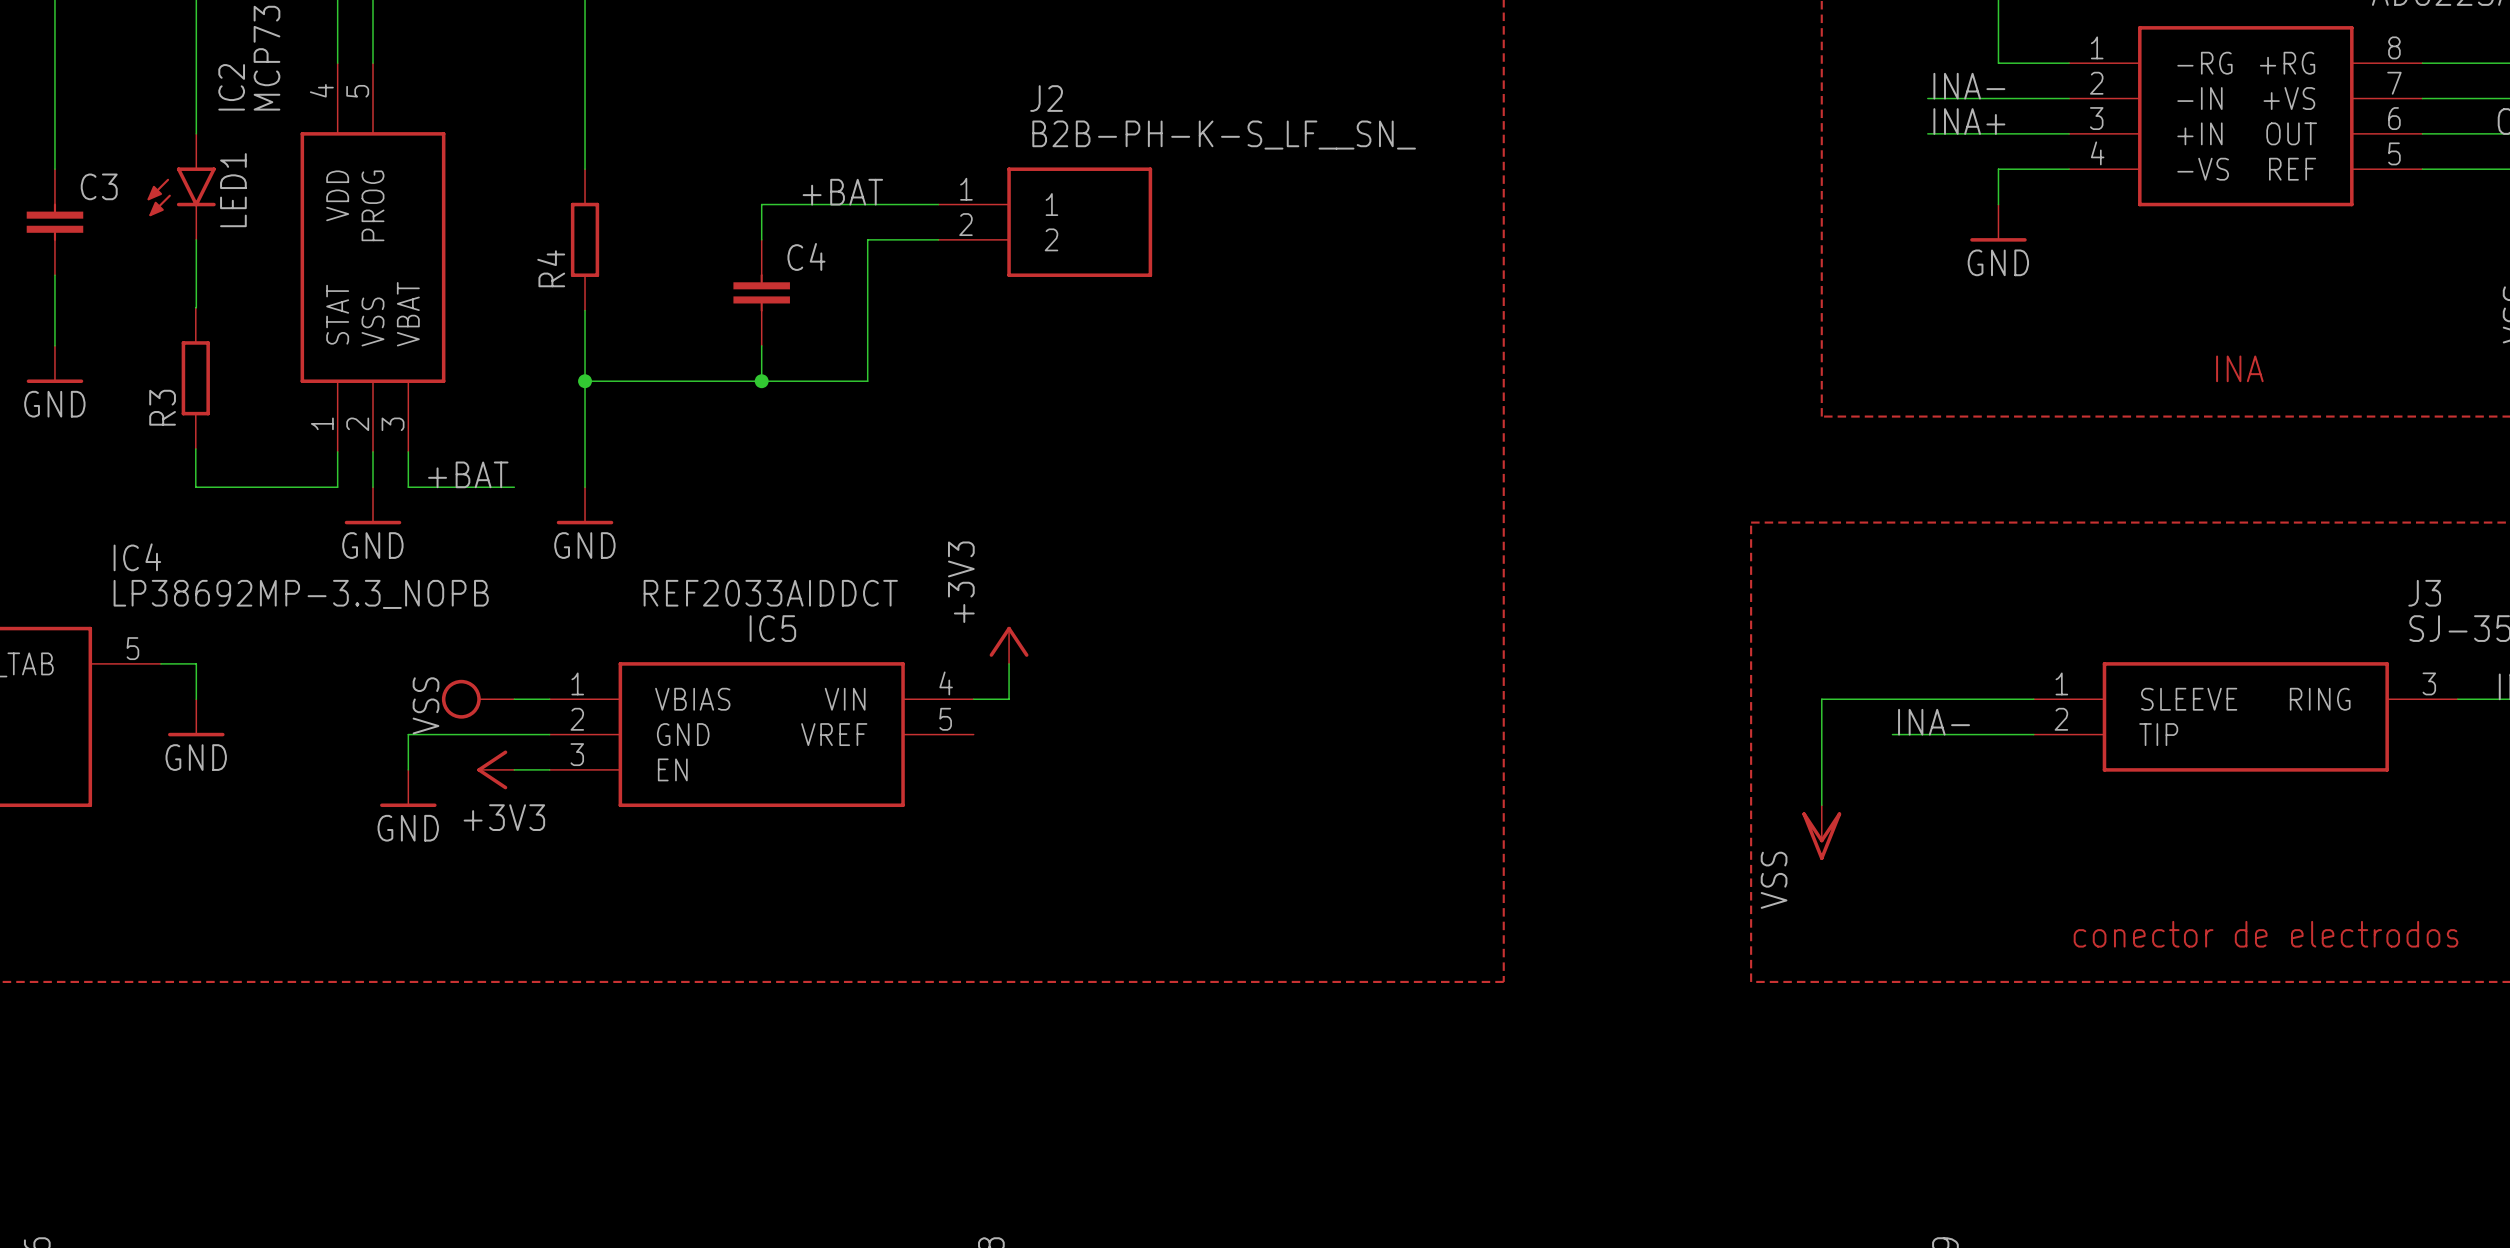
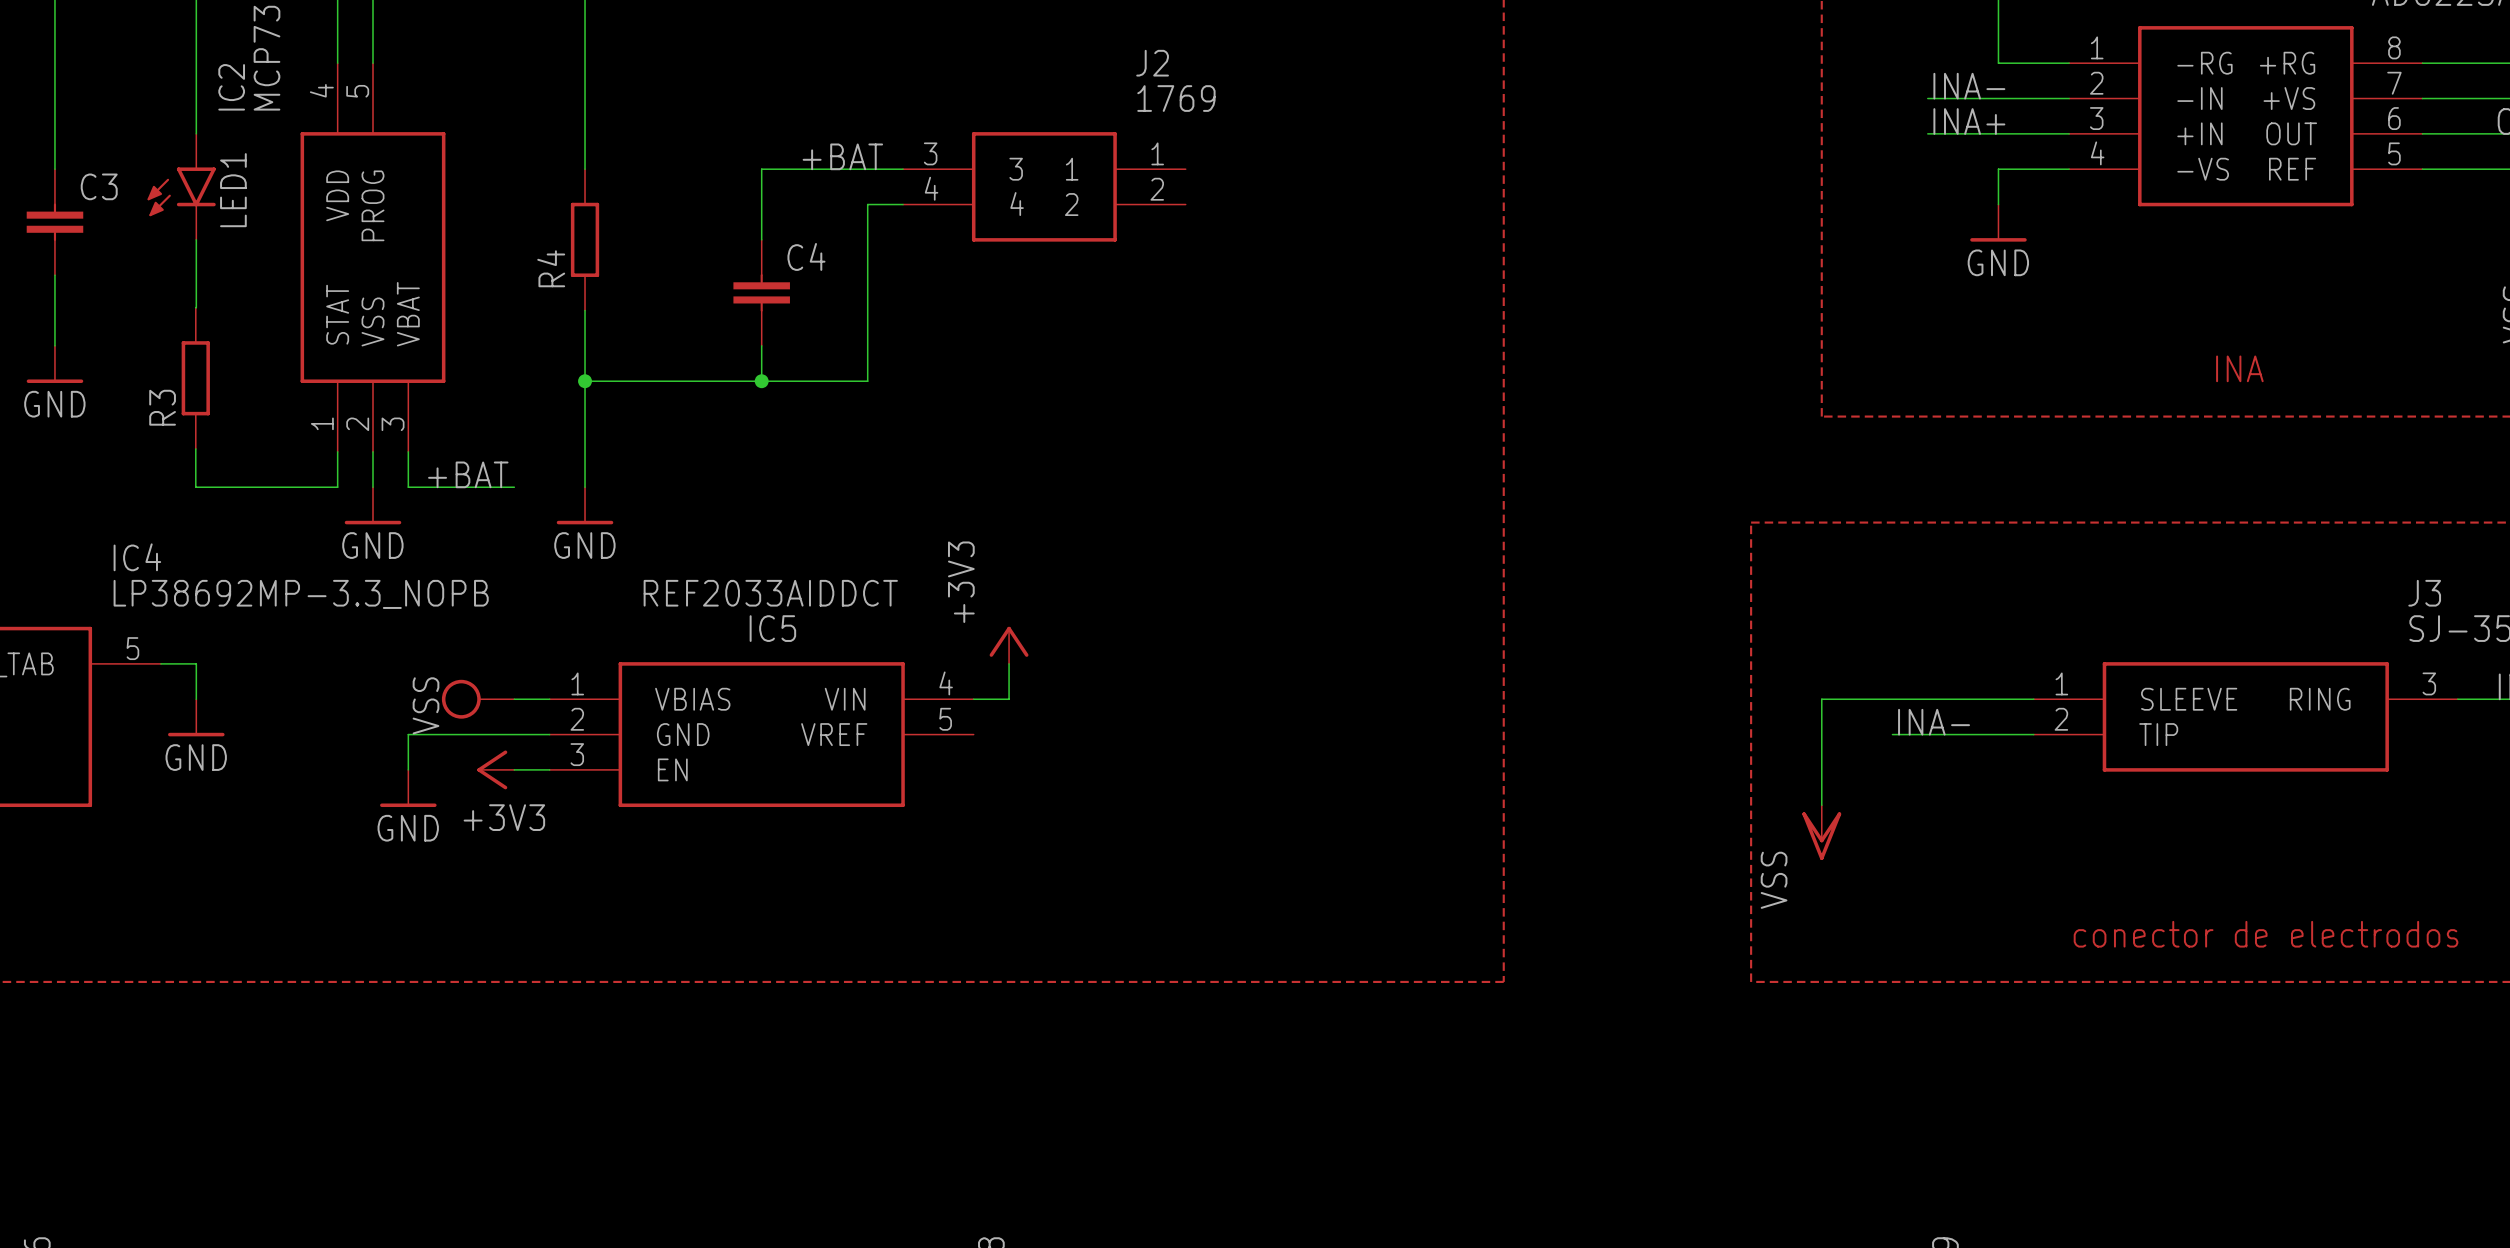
J2 name position: J2 (1046, 98) -> J2 (1152, 63)
J2 value: B2B-PH-K-S_LF__SN_ (1224, 135) -> 1769 (1176, 98)
J2 symbol: [938, 167, 1153, 277] -> [903, 132, 1186, 242]
label position: +BAT (842, 192) -> +BAT (842, 156)
wire: (761, 204) (867, 204) -> (761, 204) (761, 169) (903, 169)
wire: (867, 239) (938, 239) -> (867, 239) (867, 204)

